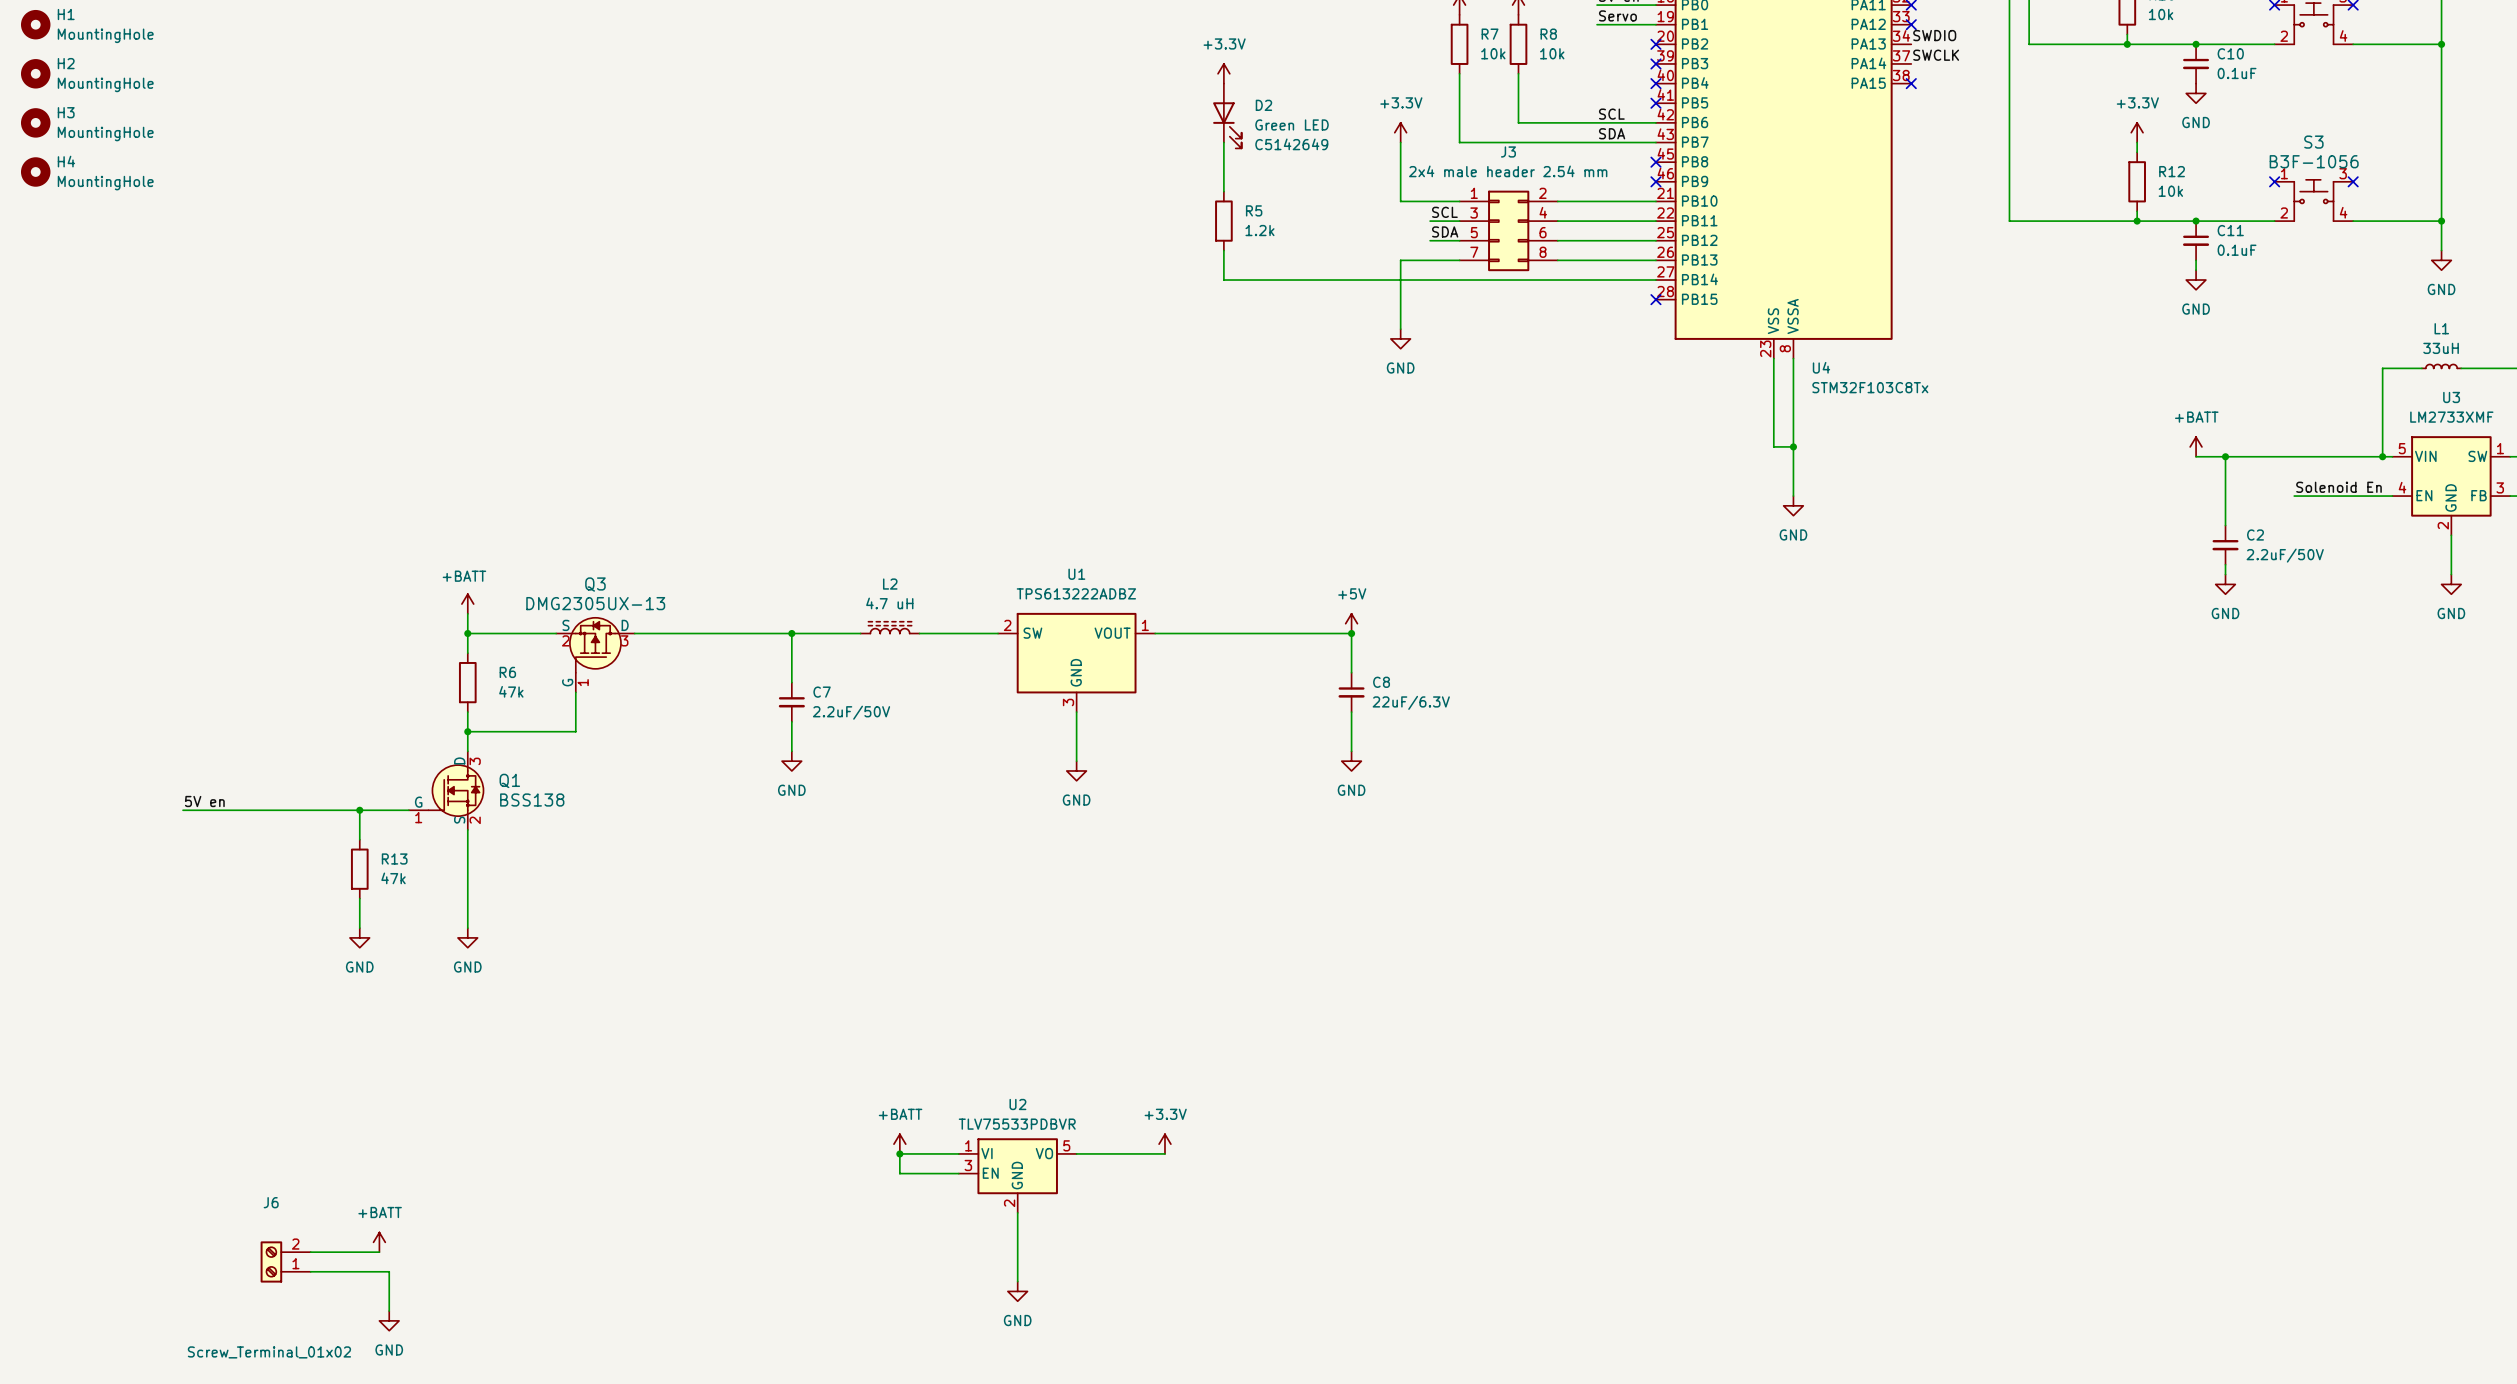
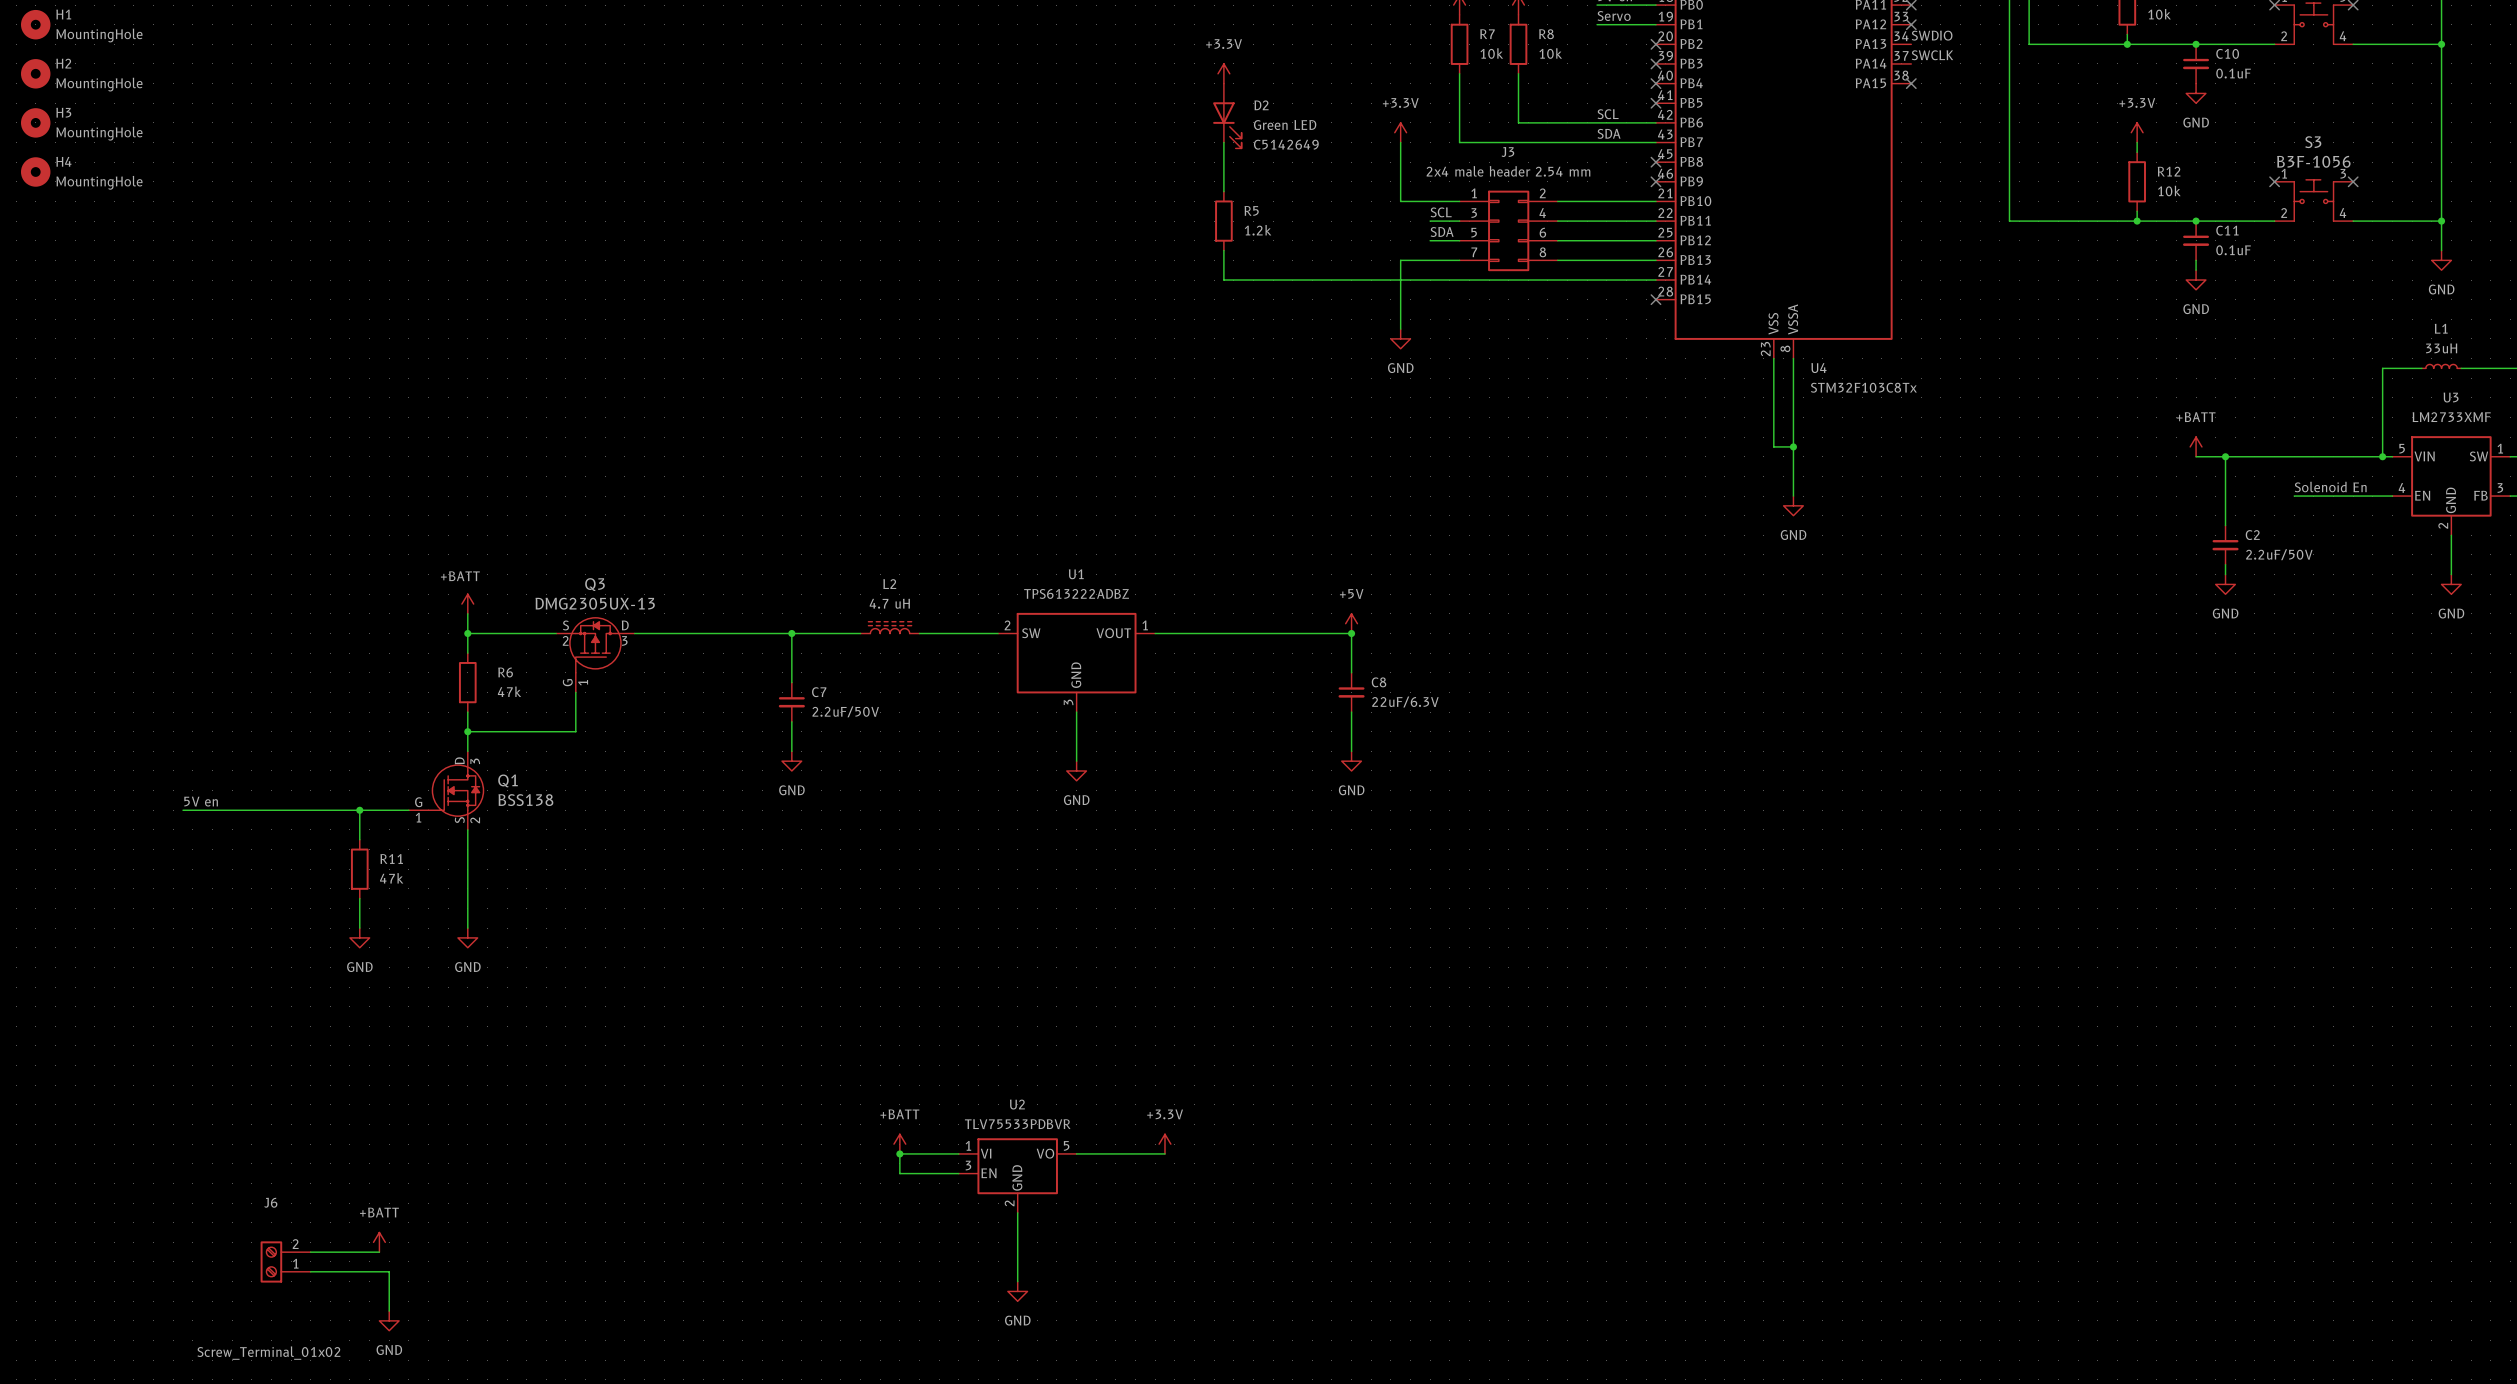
R13 name: R13 (394, 859) -> R11 (391, 859)

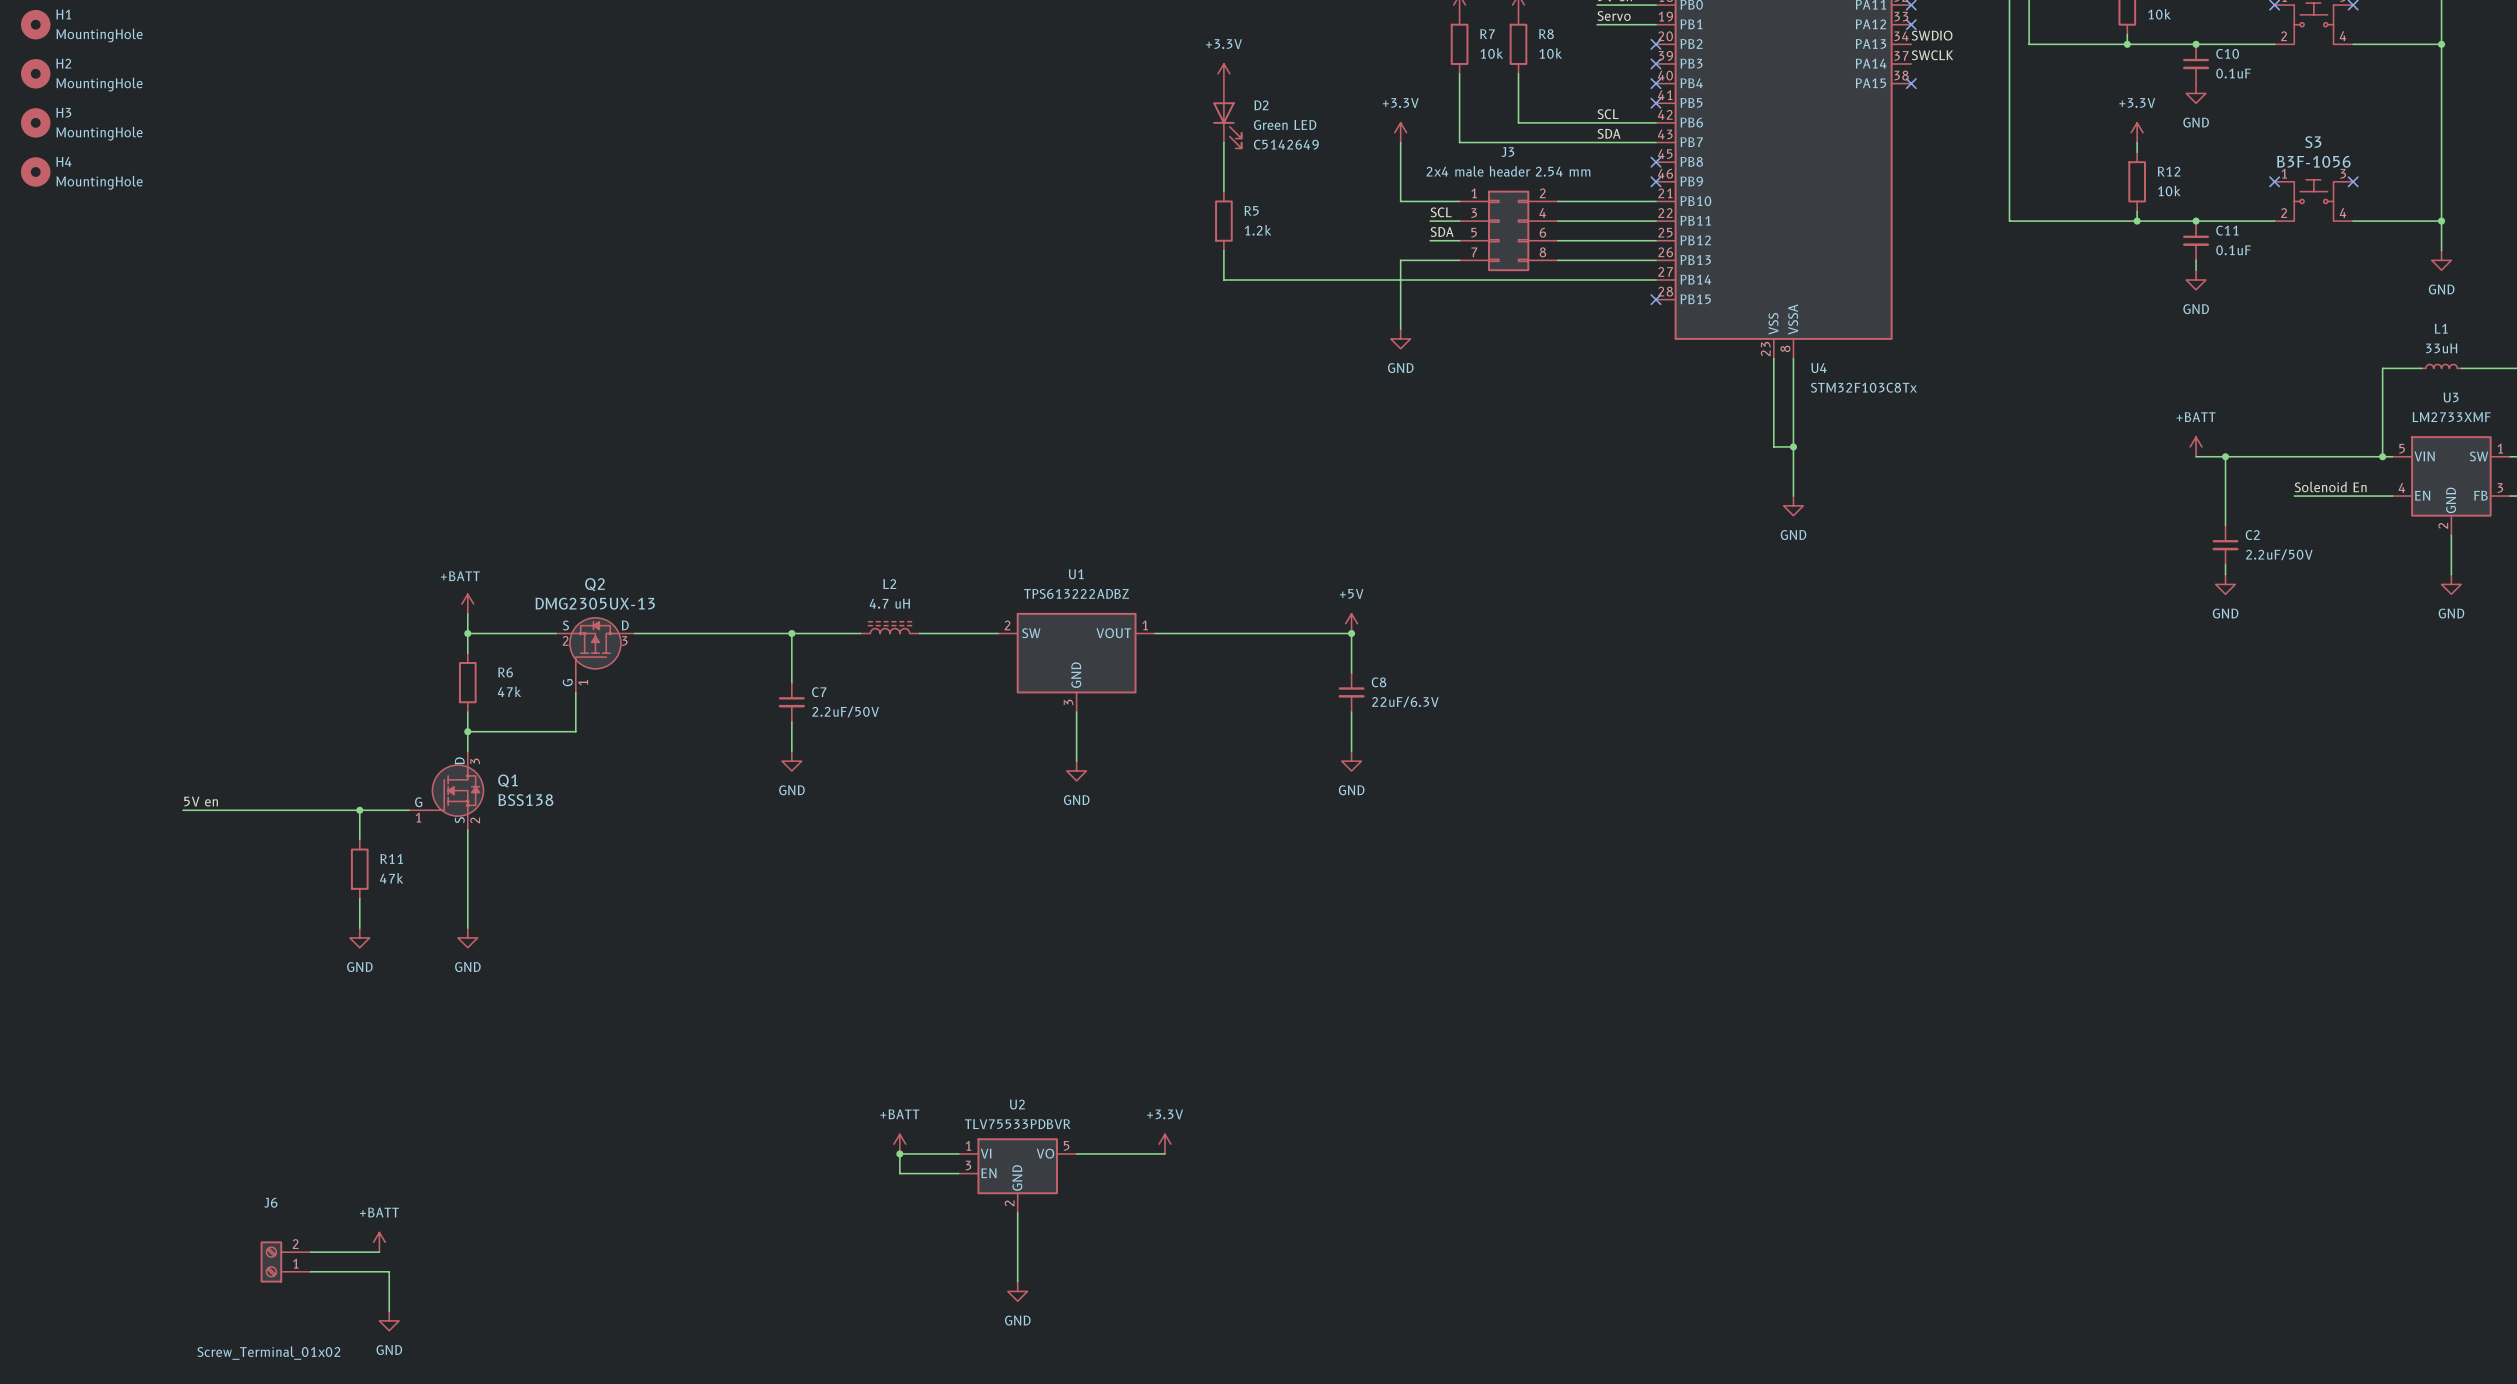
Q3 name: Q3 (594, 584) -> Q2 (594, 584)

